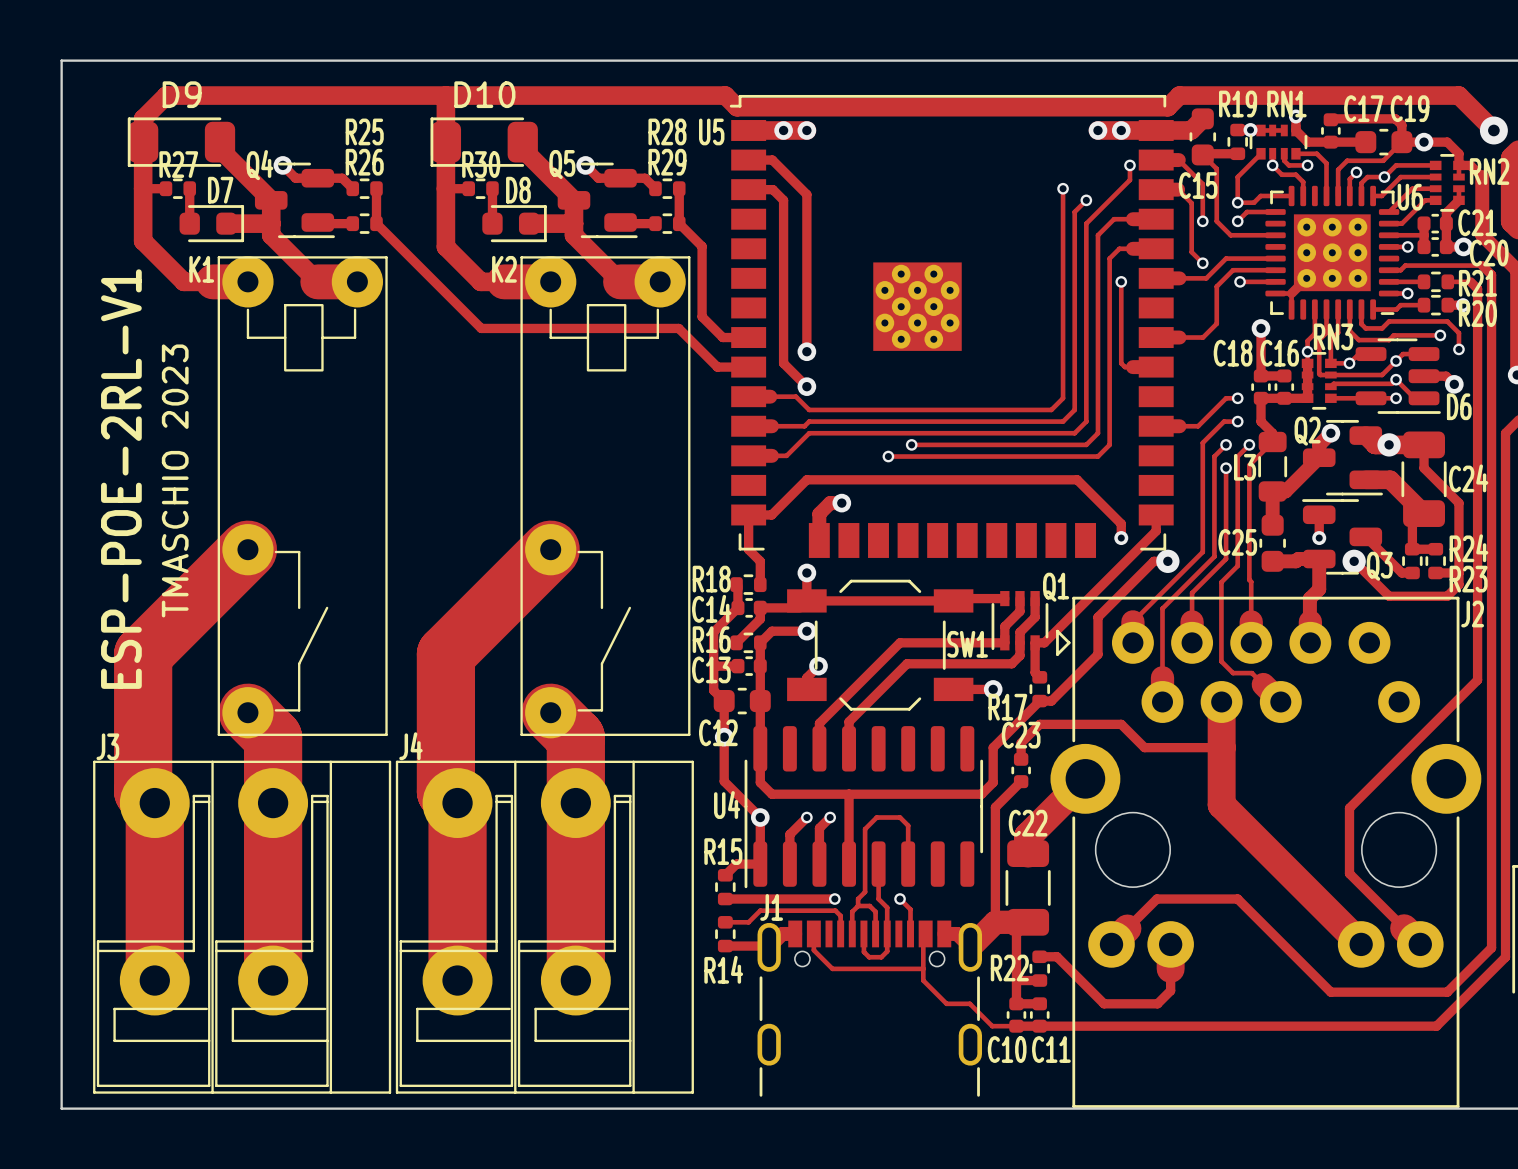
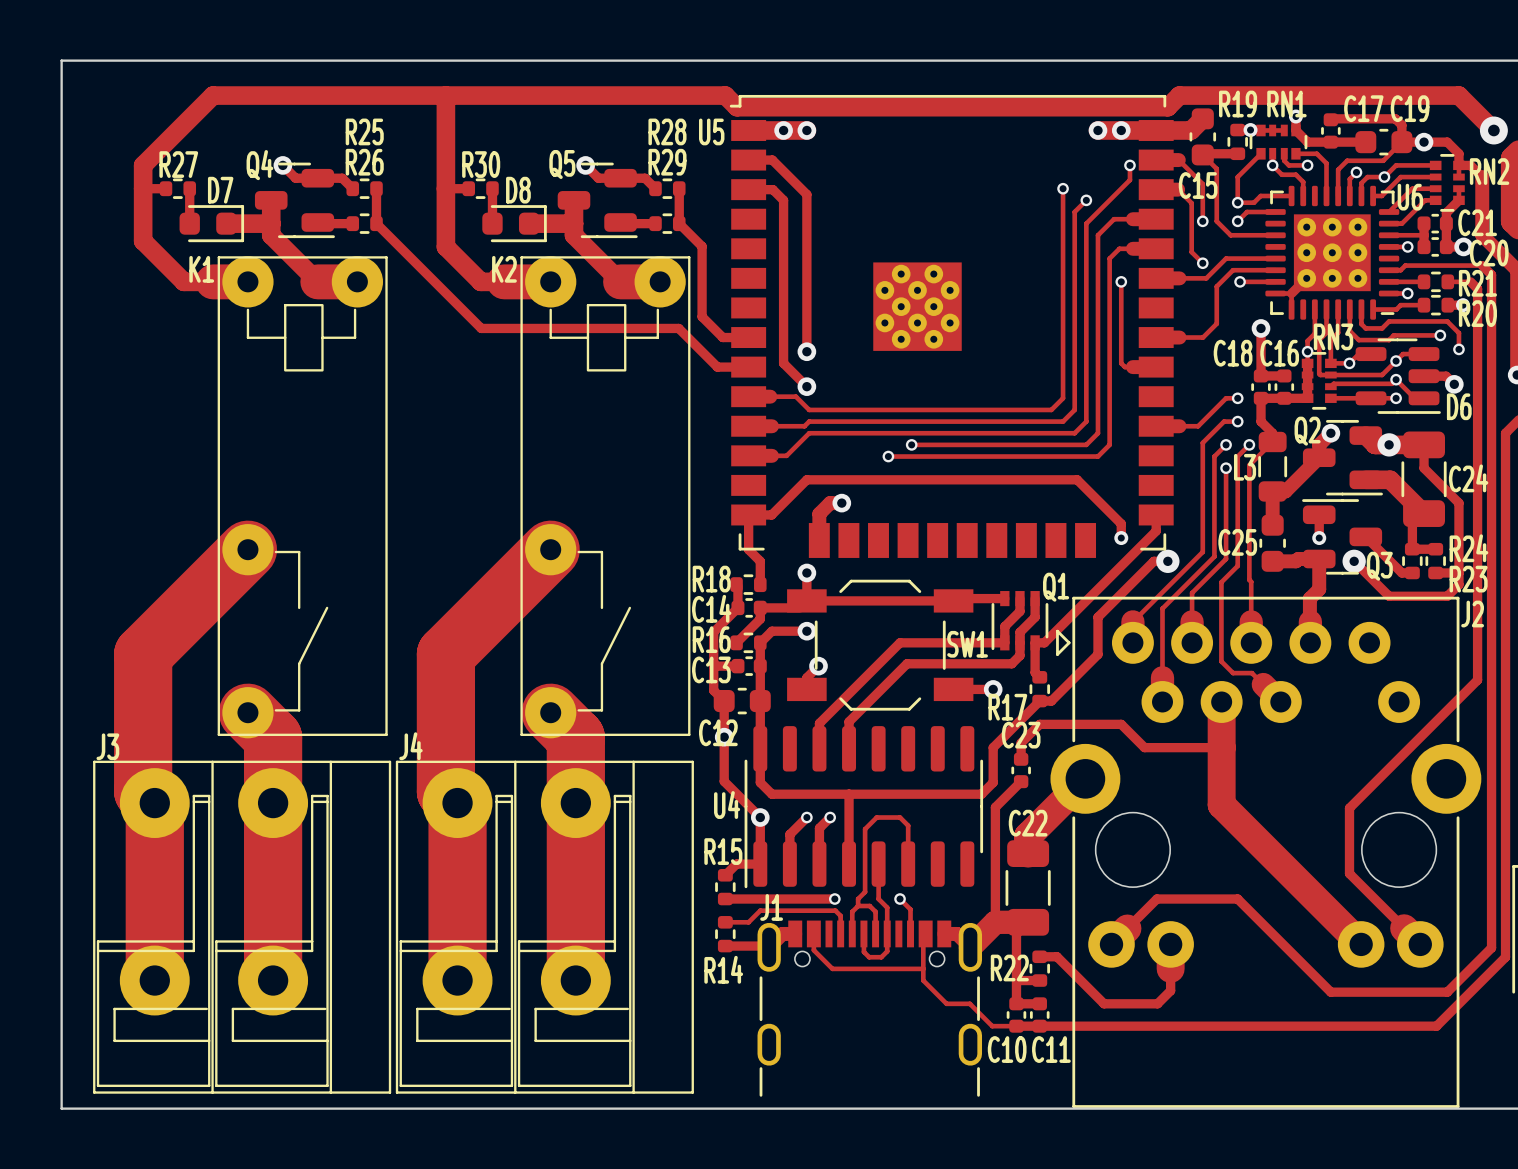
track: (213, 95) (166, 95) (143, 118) (143, 165) -> (213, 95) (143, 165)
D9: (181, 142) -> none
track: (220, 142) (220, 149) (271, 200) -> none
D10: (484, 142) -> none
track: (522, 142) (522, 149) (573, 200) -> none
text: ESP-POE-2RL-V1 (121, 479) -> none
text: TMASCHIO 2023 (175, 480) -> none

